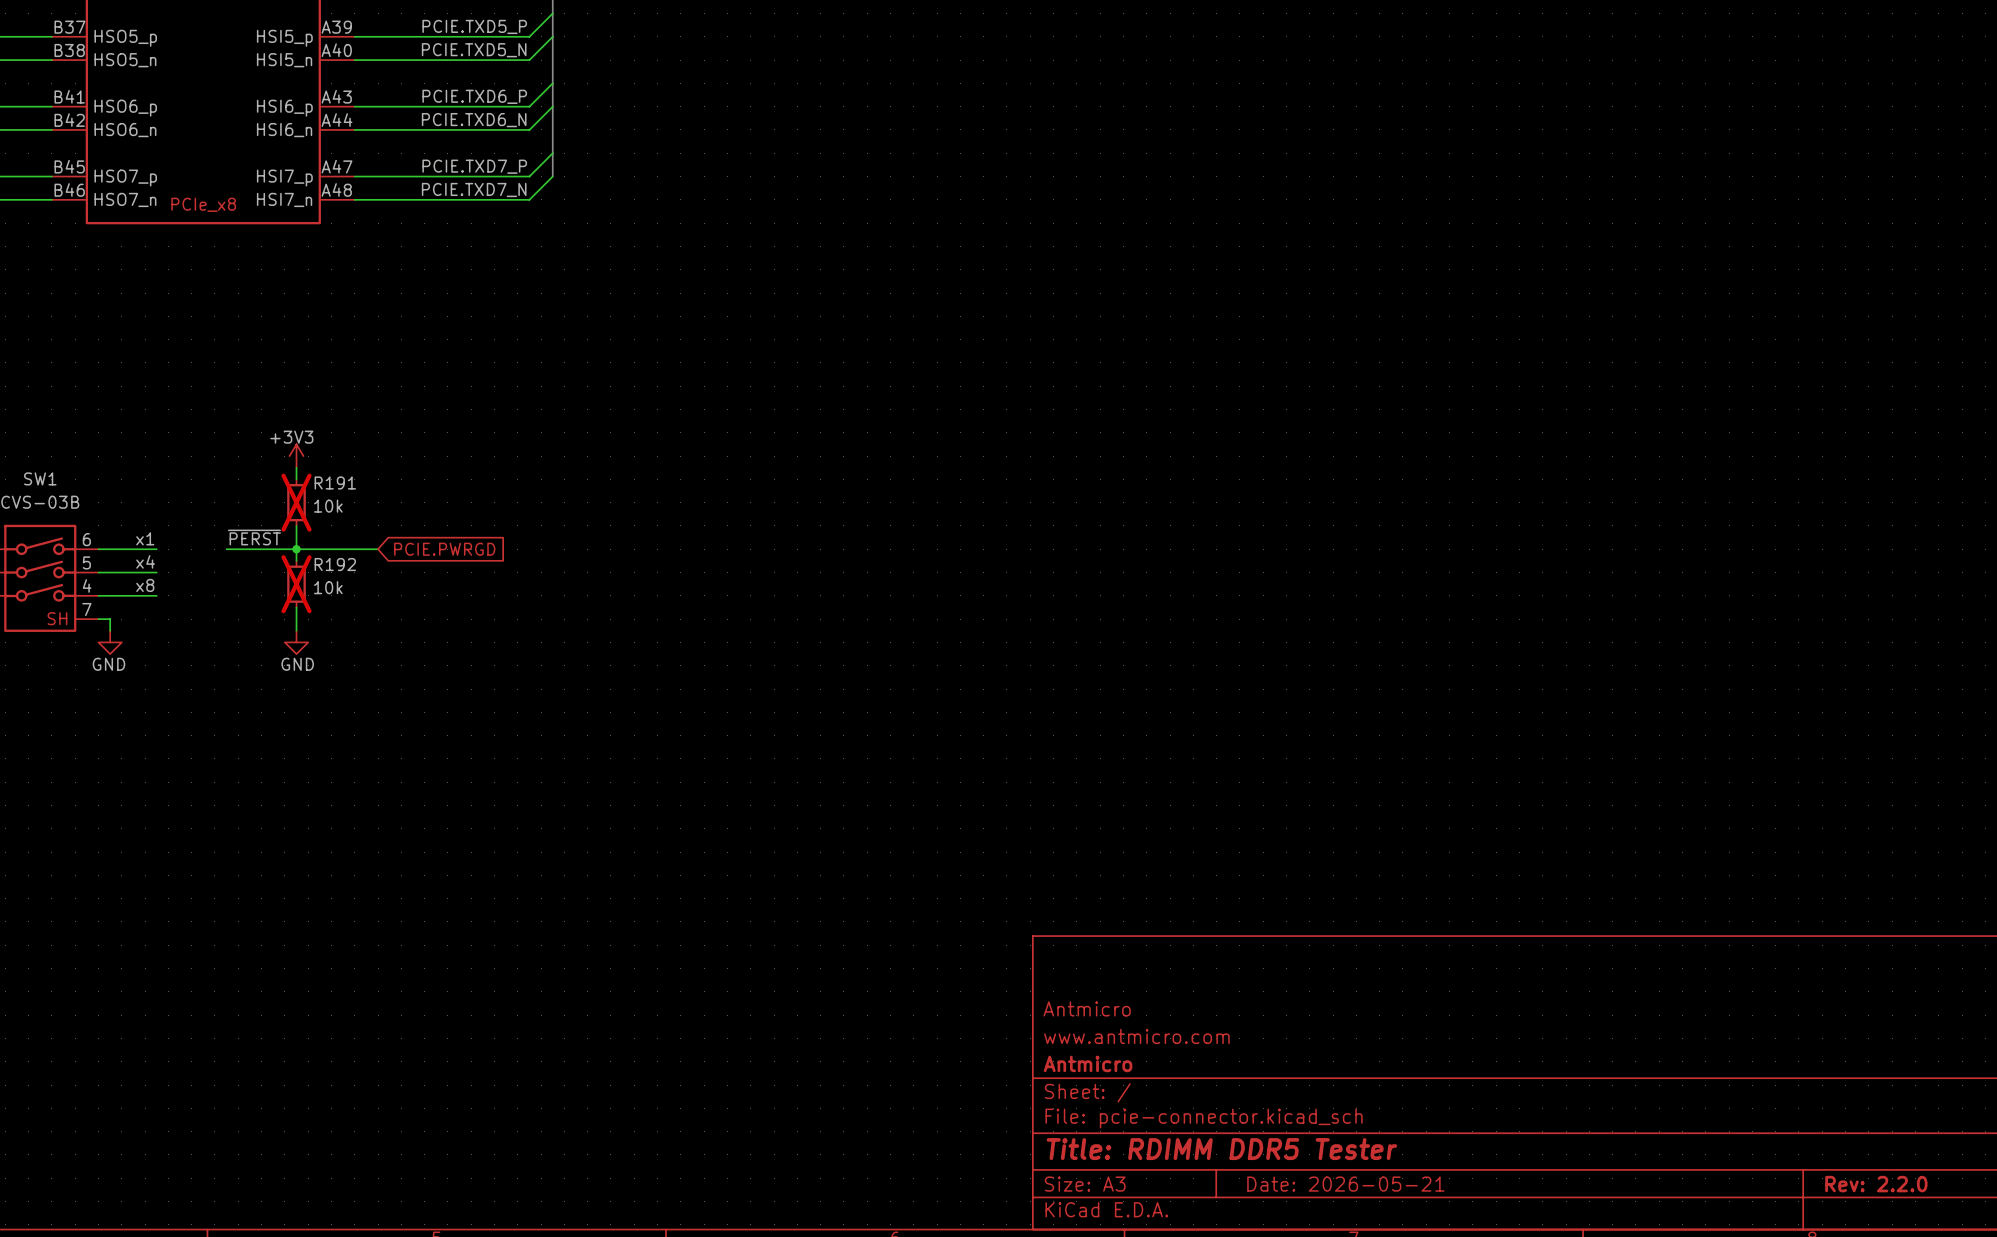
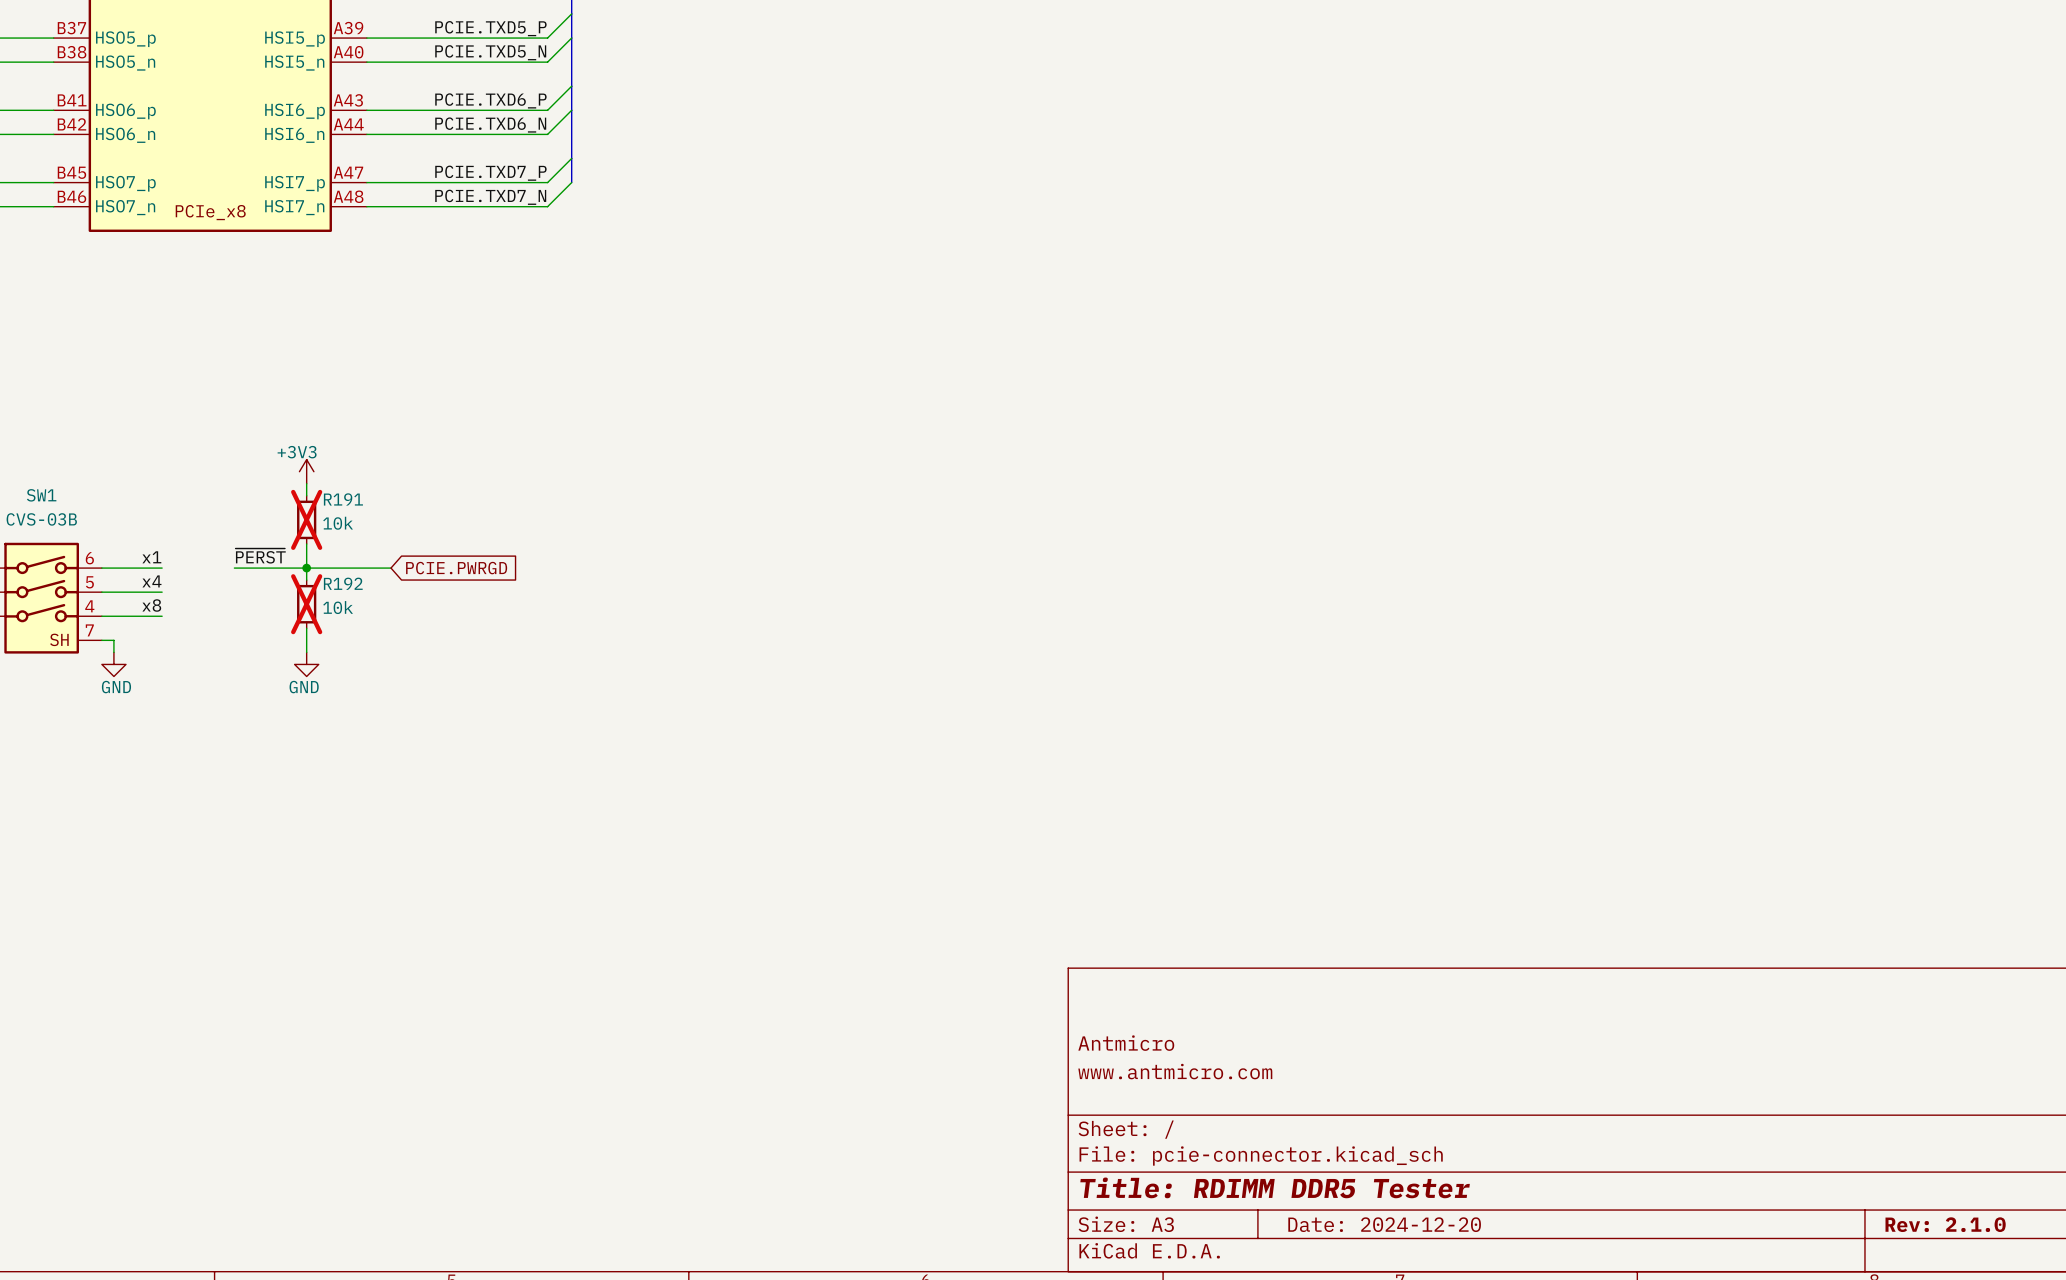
title block: Antmicro (1088, 1063) -> none
title block: Date: 2026-05-21 (1345, 1184) -> Date: 2024-12-20 (1384, 1224)
title block: Rev: 2.2.0 (1876, 1184) -> Rev: 2.1.0 (1945, 1224)

